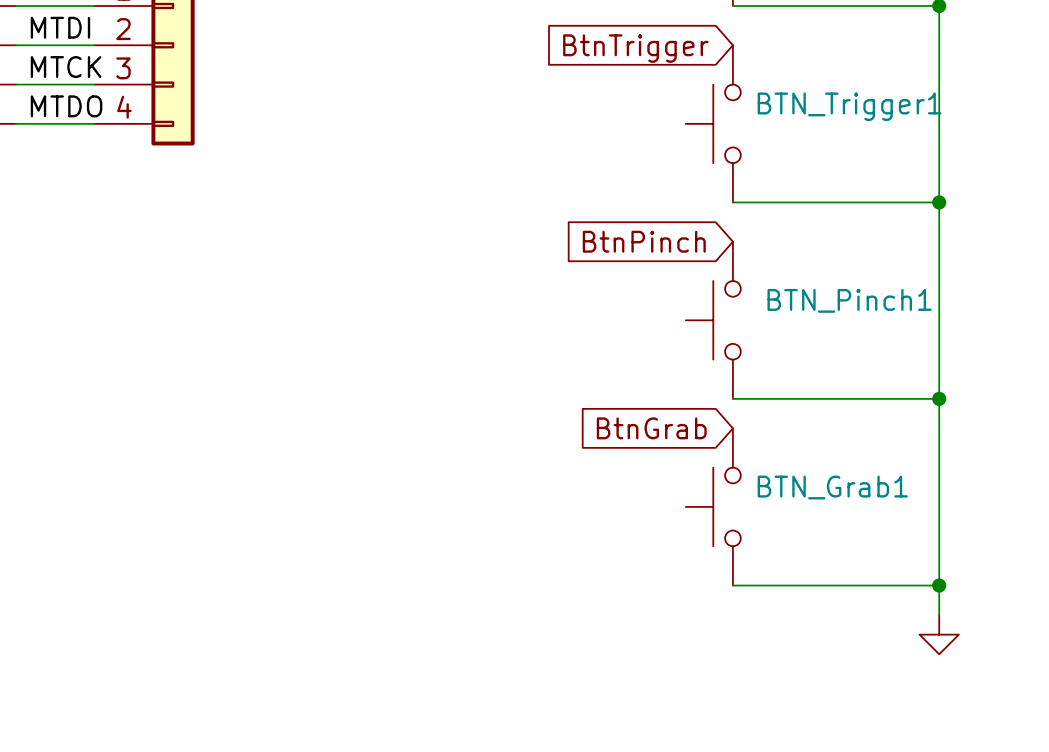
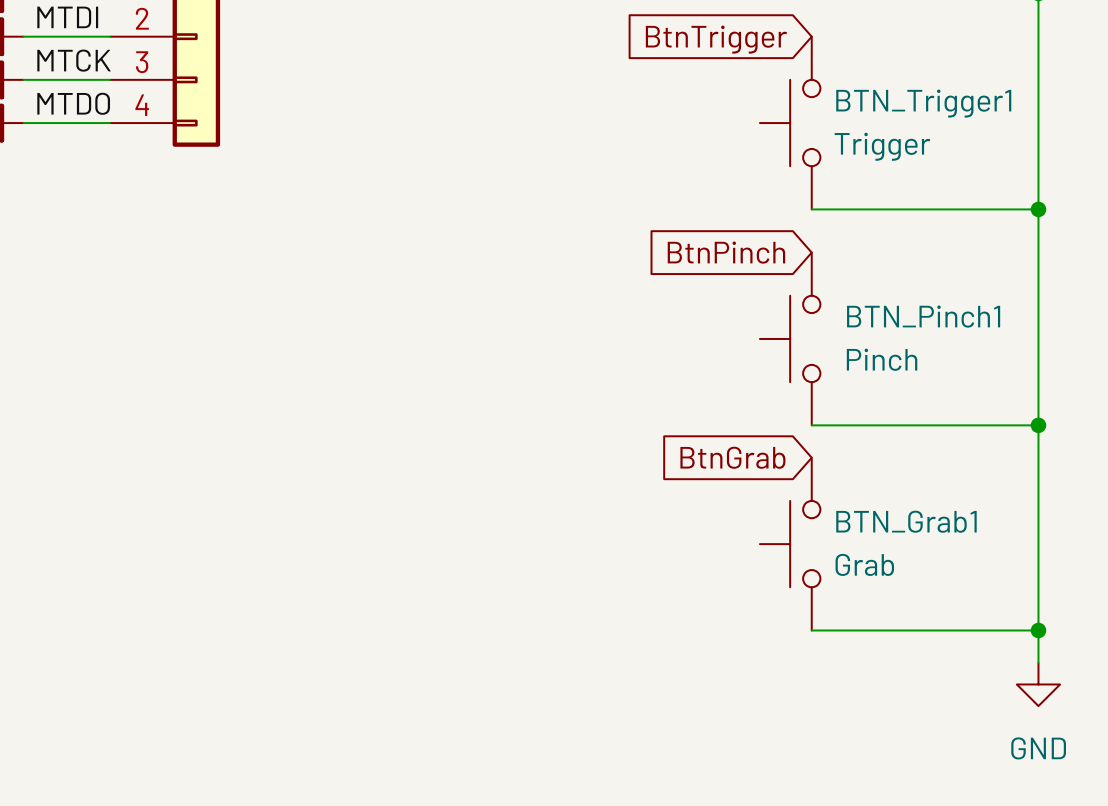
BTN_Trigger1 value: none -> Trigger (882, 146)
BTN_Pinch1 value: none -> Pinch (882, 359)
BTN_Grab1 value: none -> Grab (864, 564)
power symbol text: none -> GND (1038, 748)

